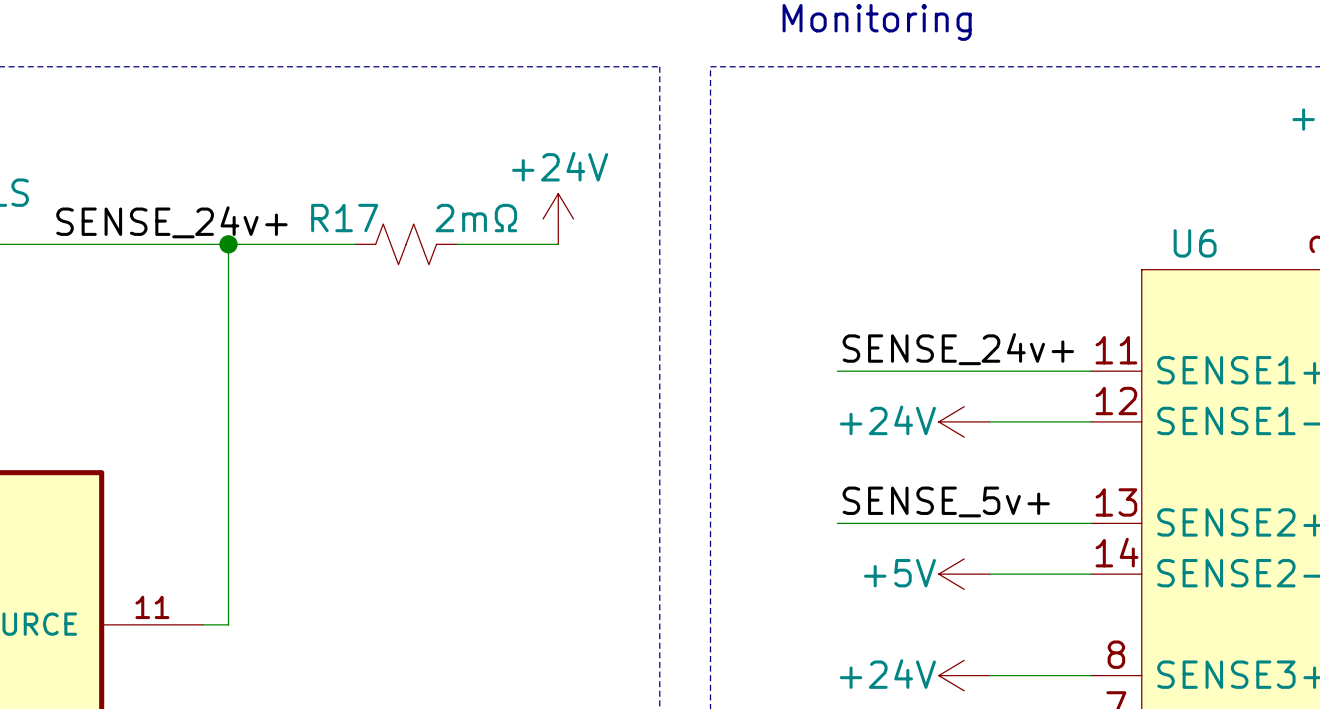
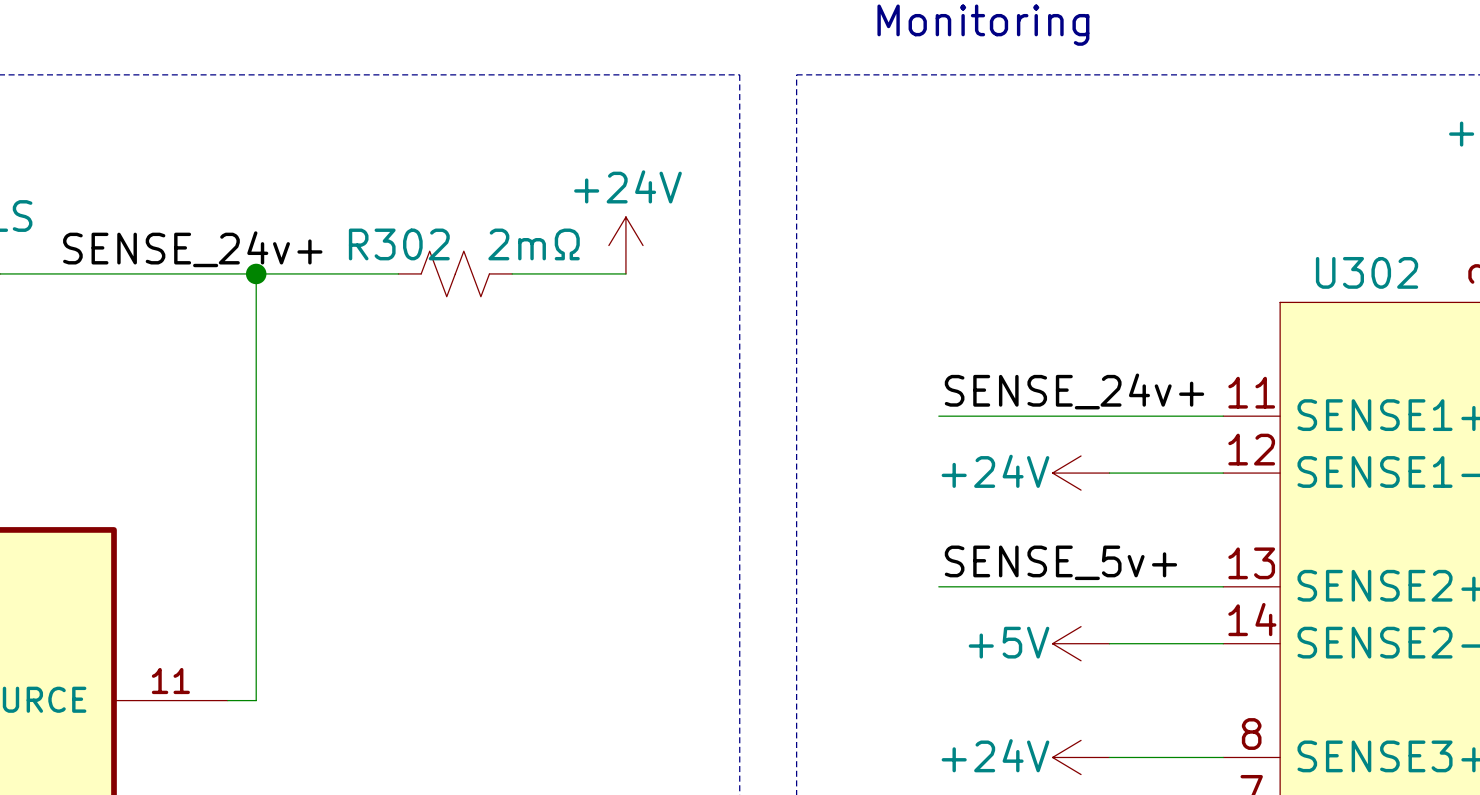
R17 name: R17 (344, 218) -> R302 (399, 244)
U6 name: U6 (1195, 243) -> U302 (1367, 272)

